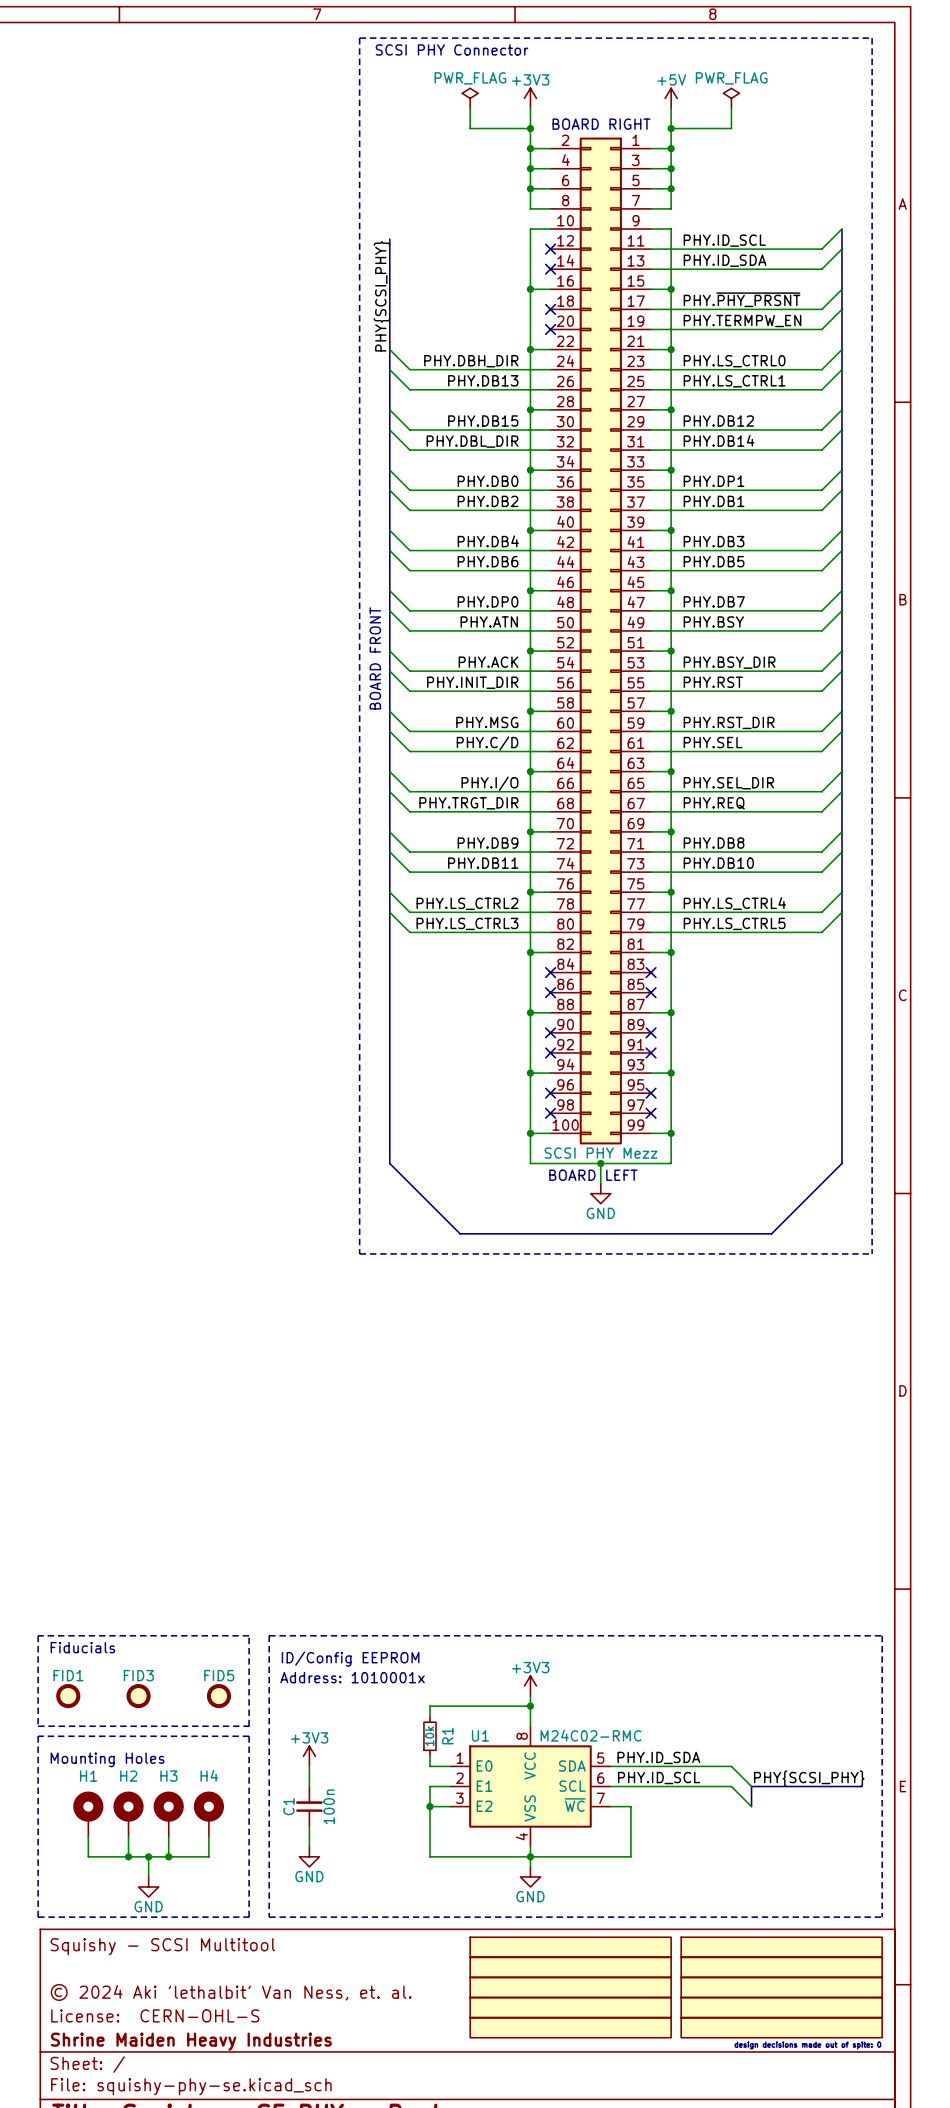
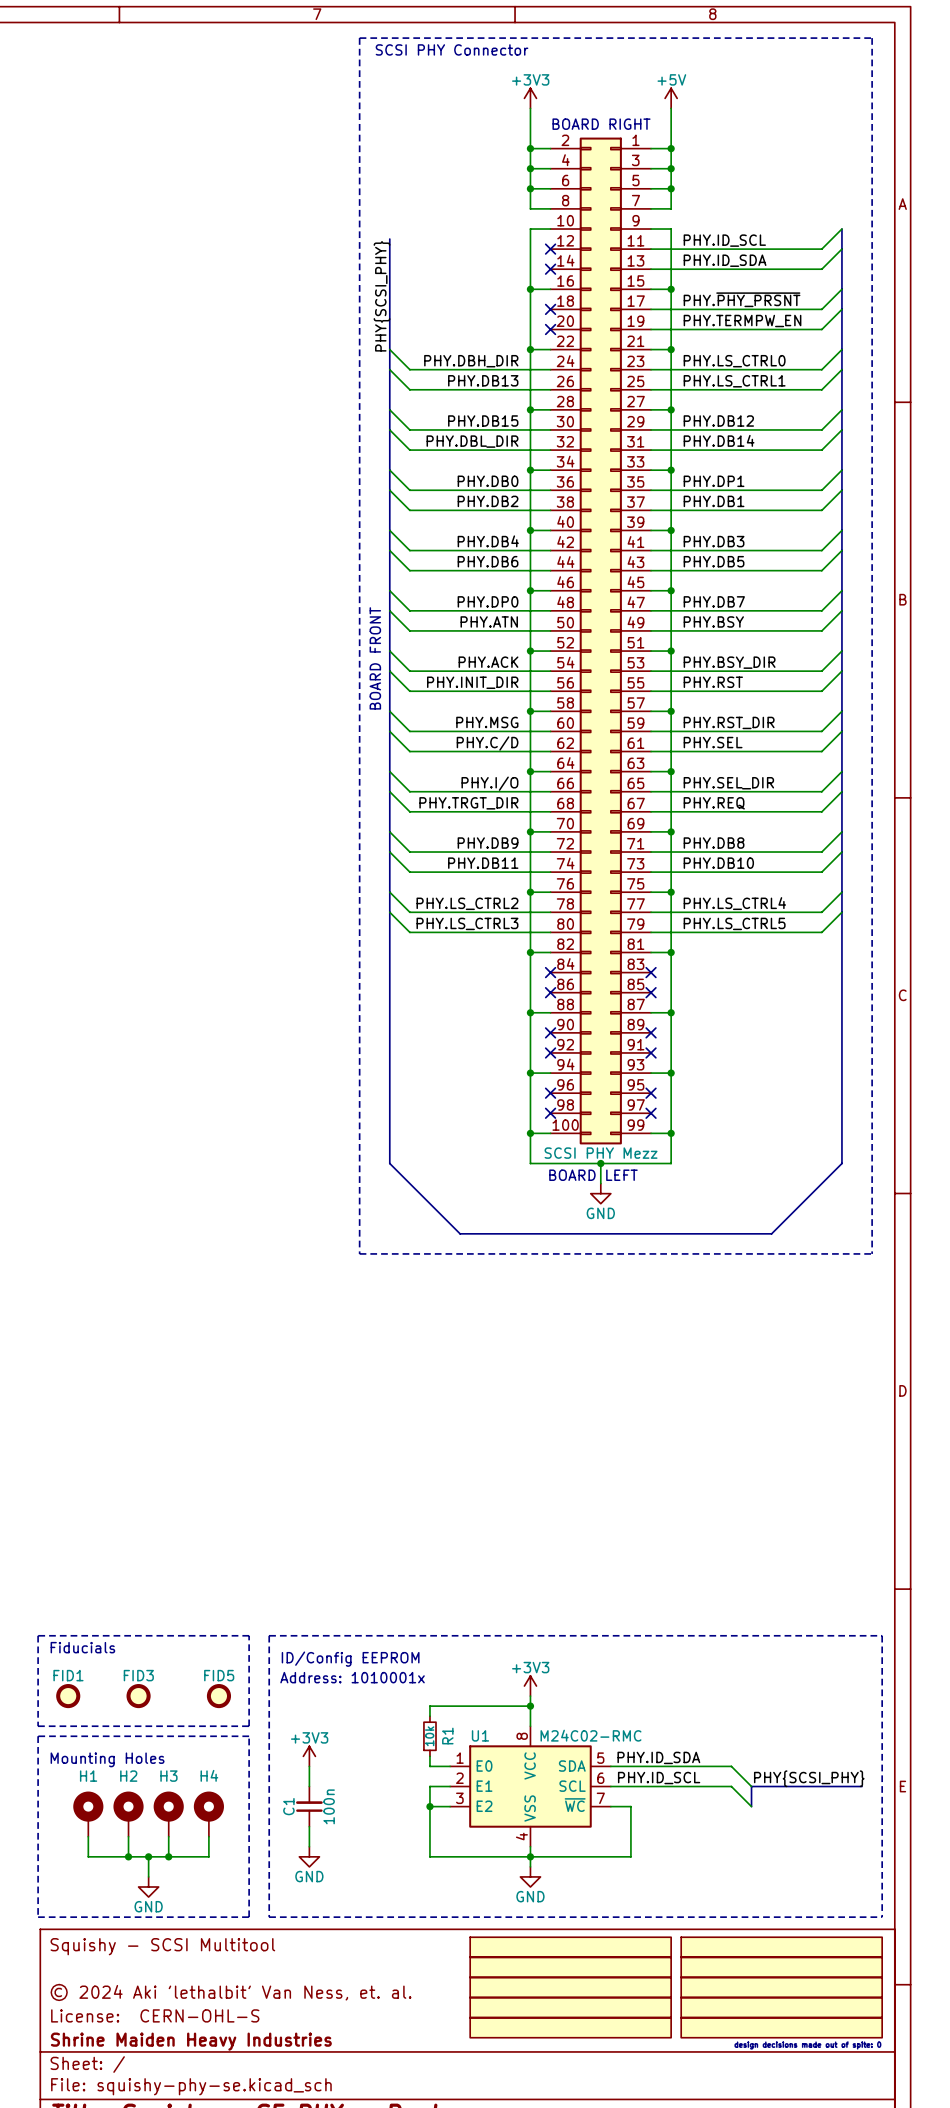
power symbol: PWR_FLAG (470, 98) -> none
power symbol: PWR_FLAG (731, 98) -> none
wire: (470, 108) (470, 128) (530, 128) -> none
wire: (731, 108) (731, 128) (671, 128) -> none
junction: (530, 128) -> none
junction: (671, 128) -> none

